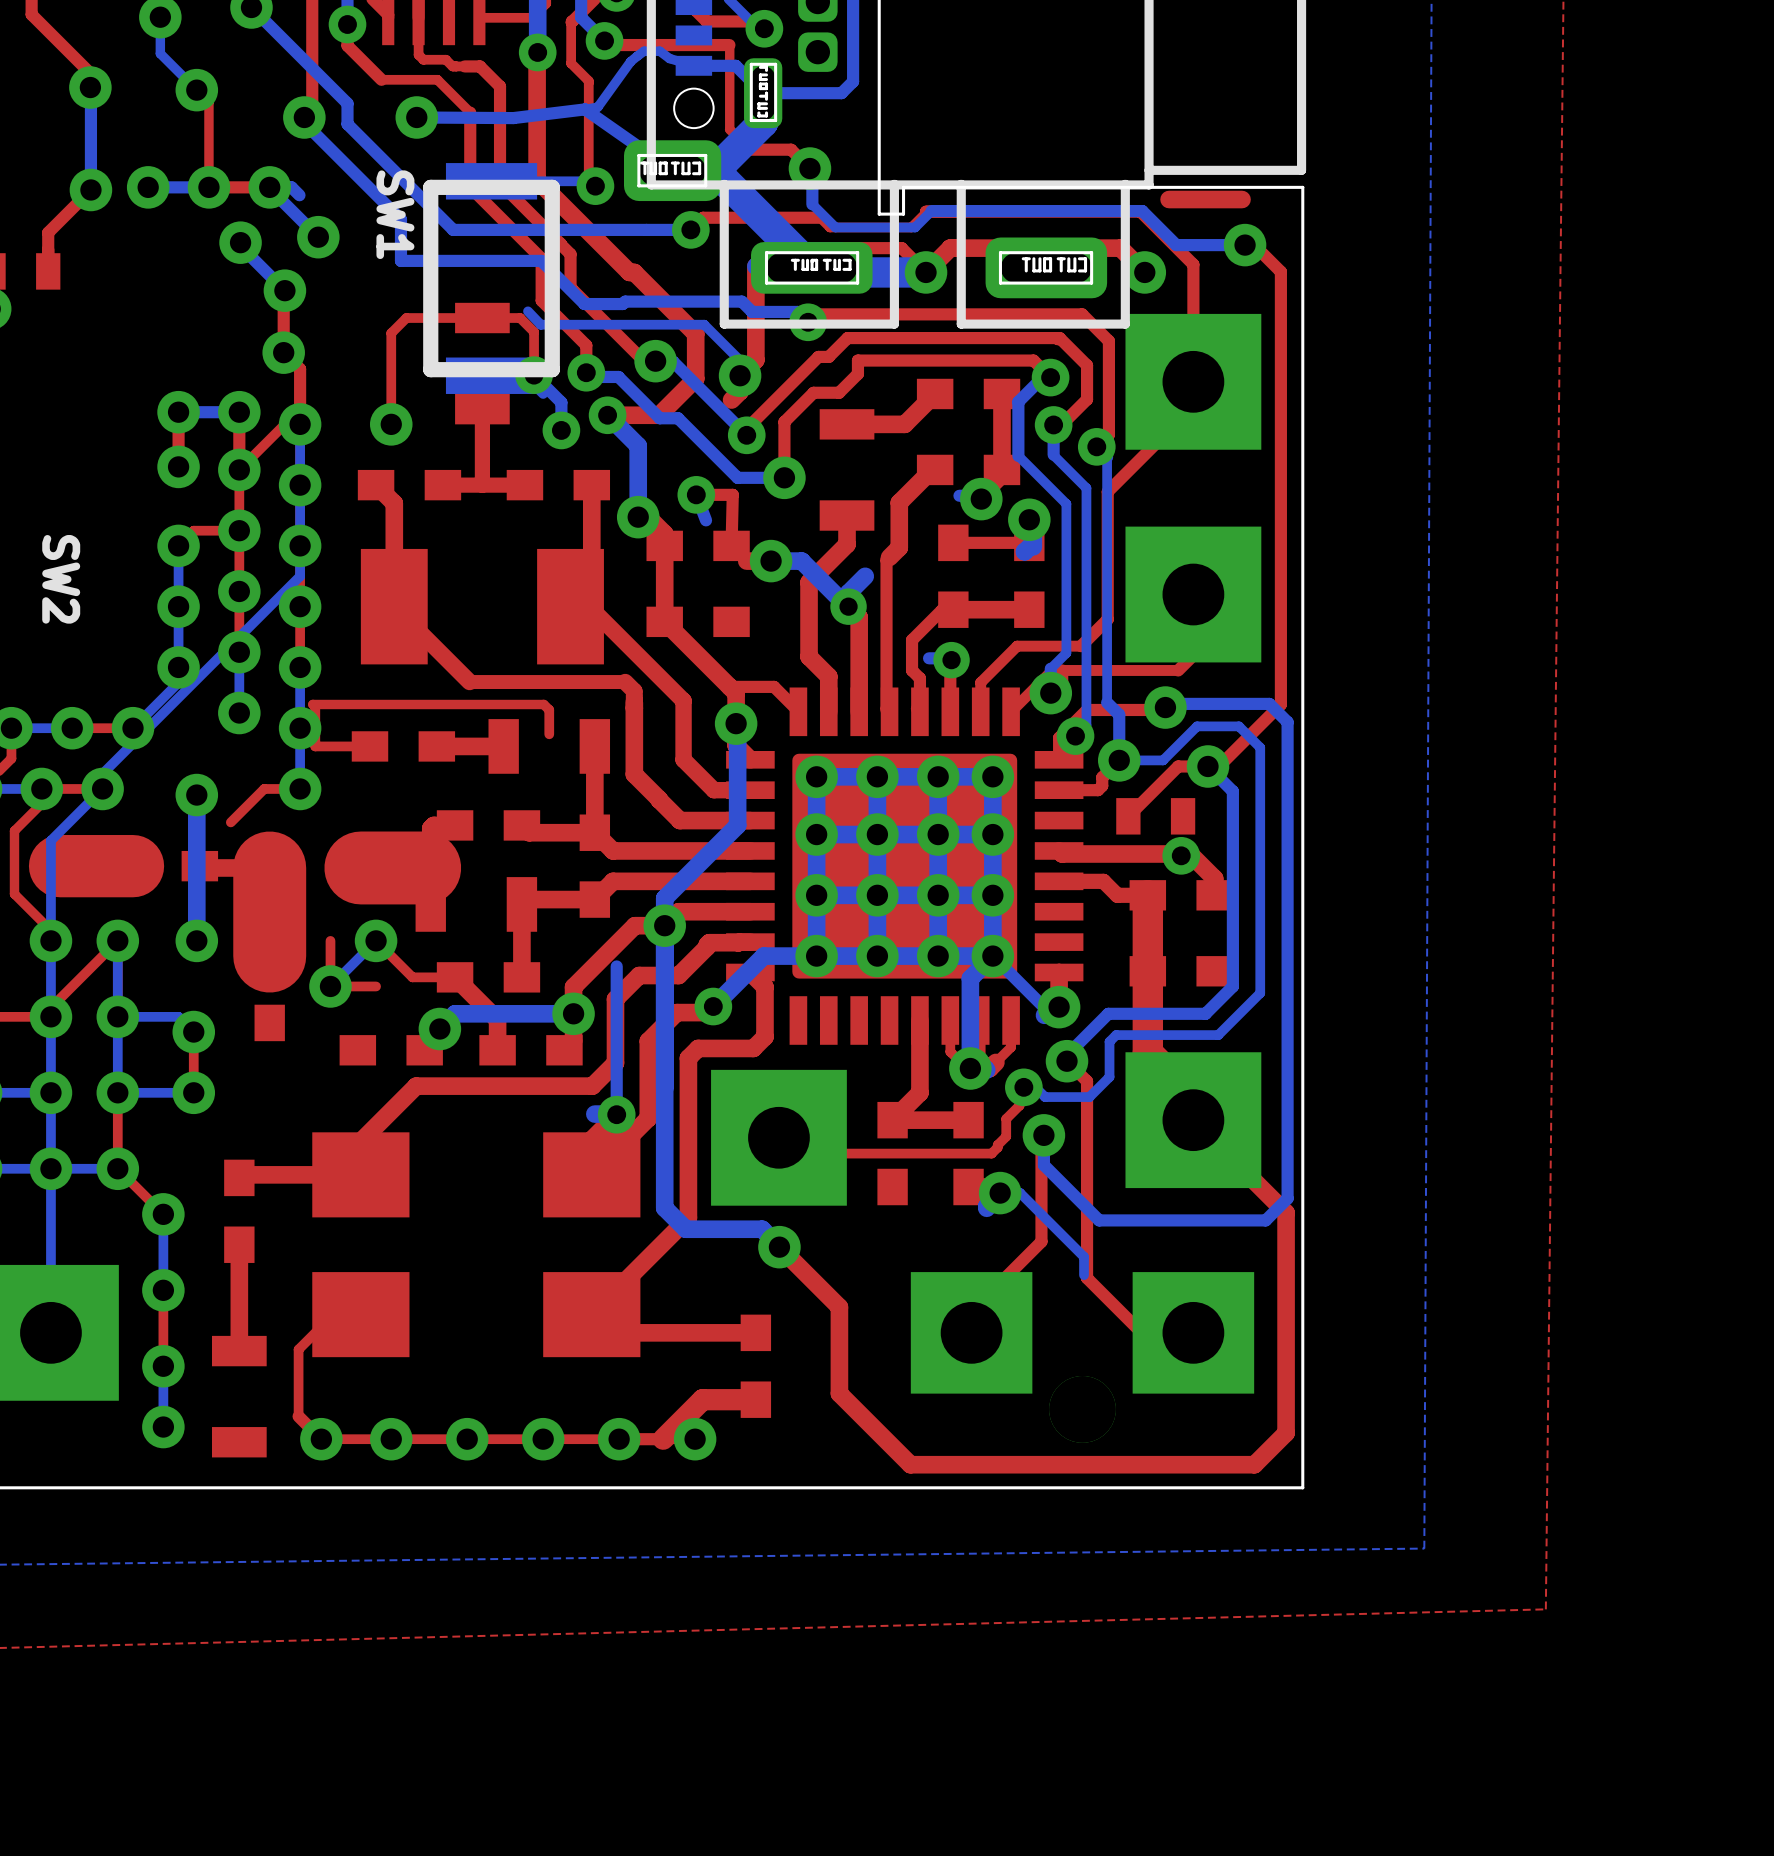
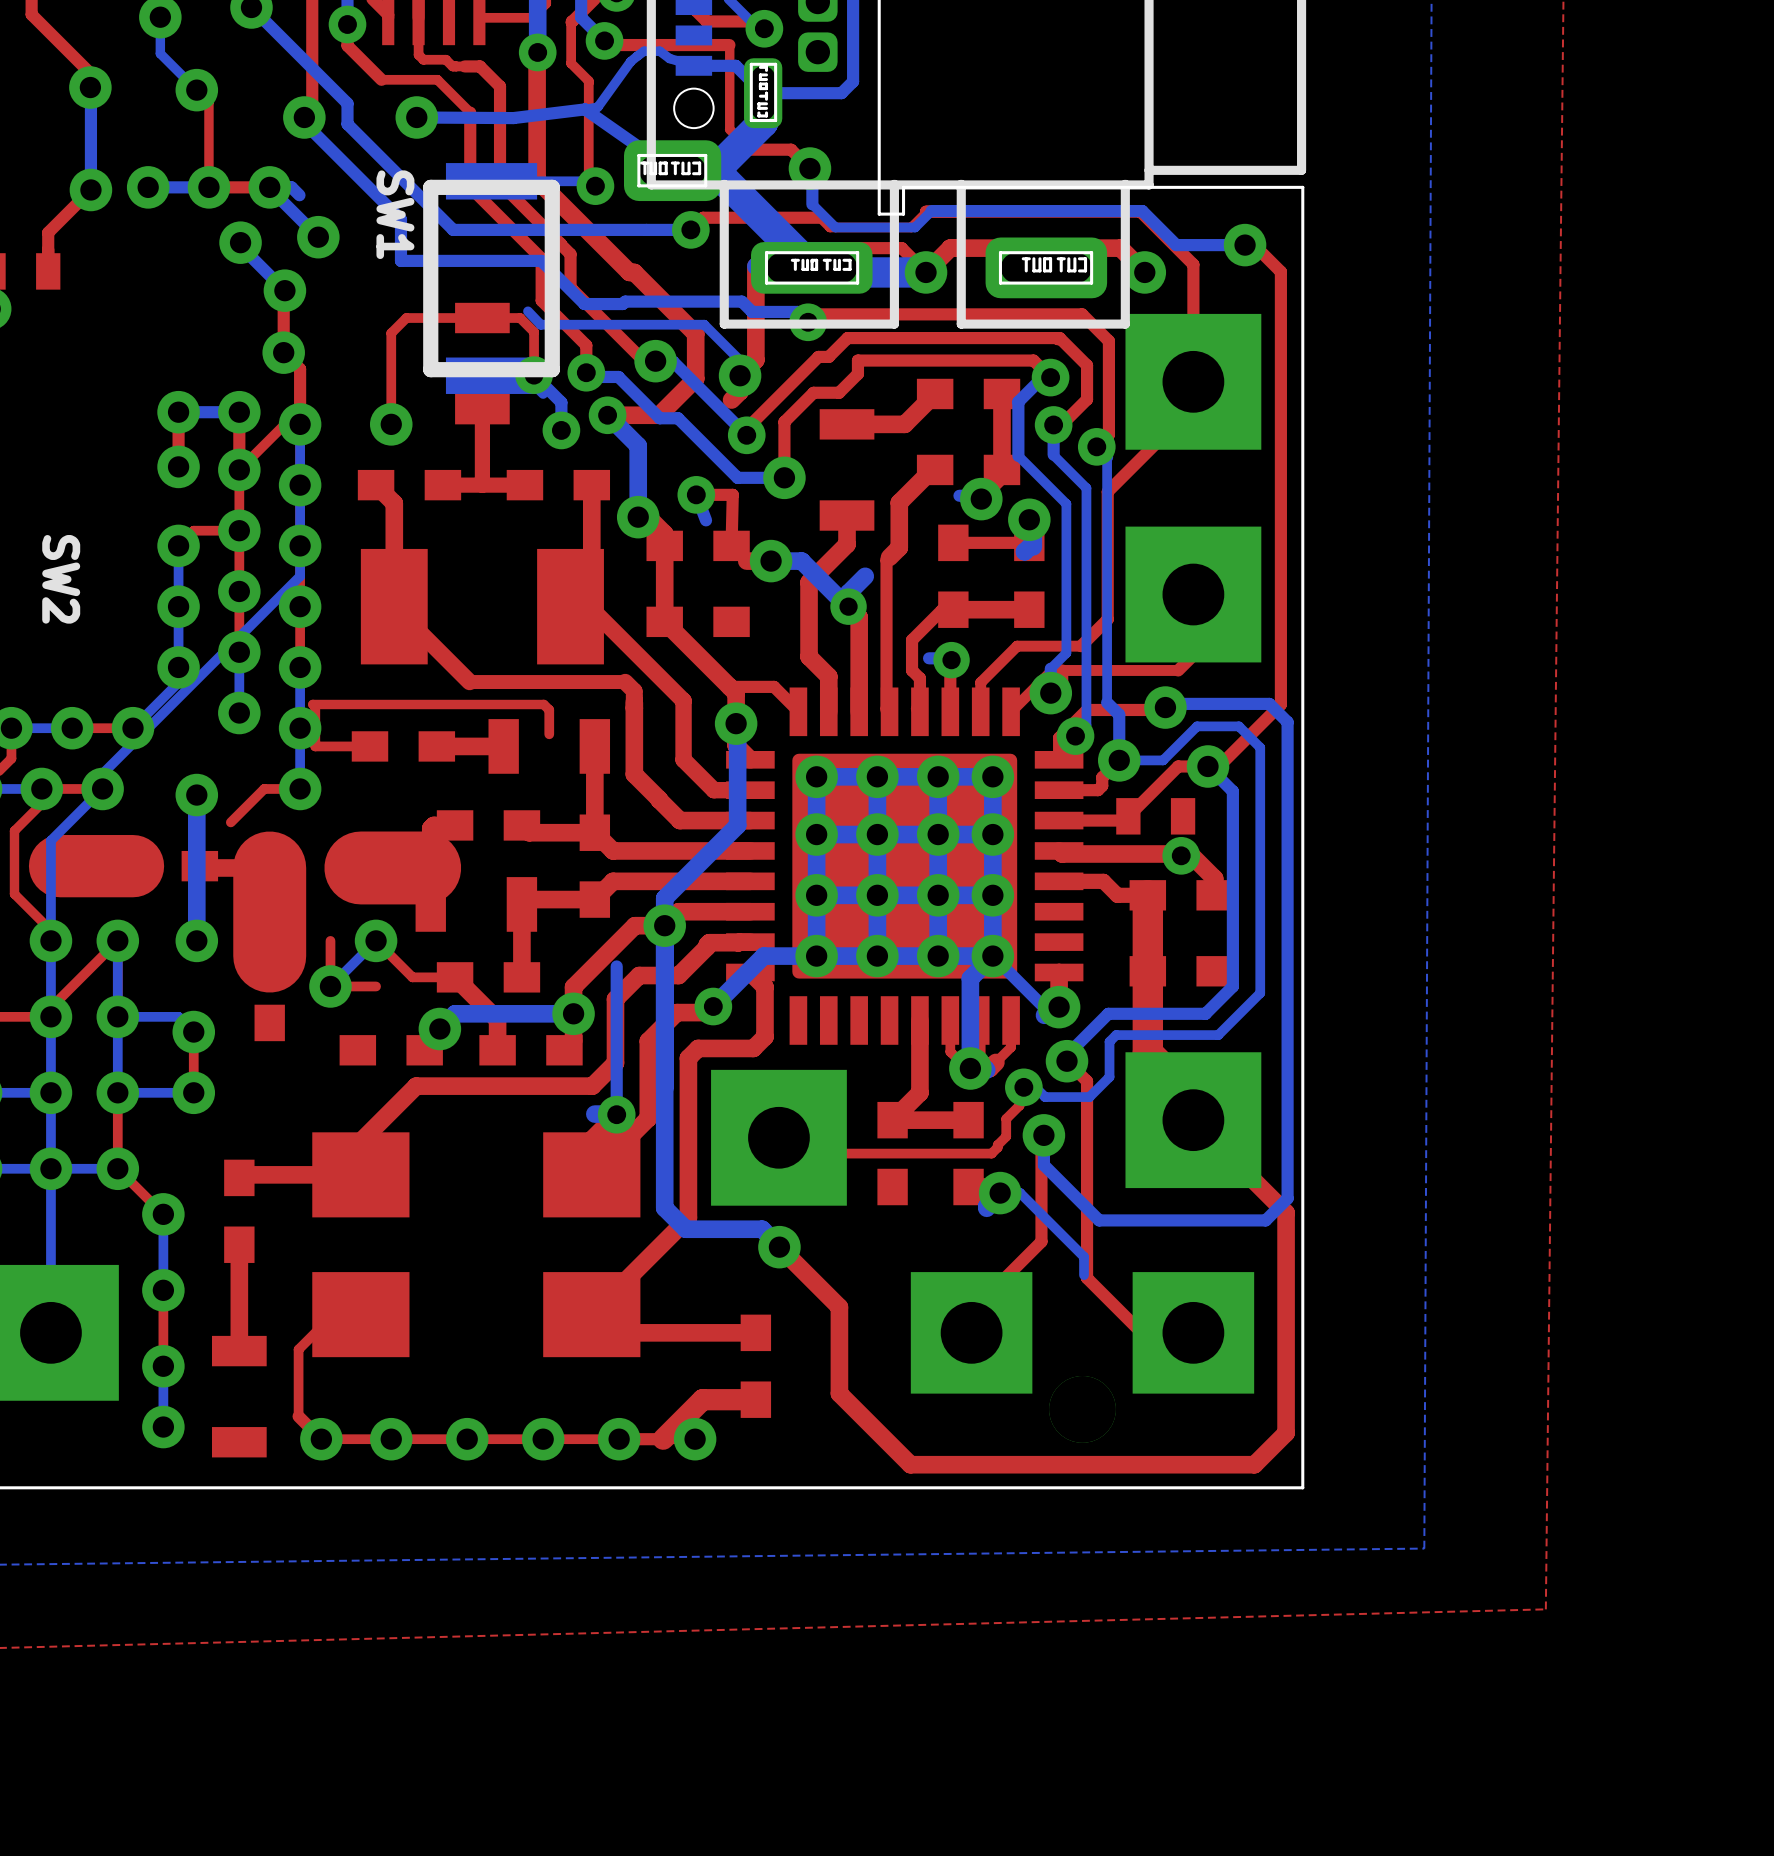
top track: (1242, 199) (1169, 199) -> none
top track: none -> (1128, 816) (1122, 820) (1059, 820)

